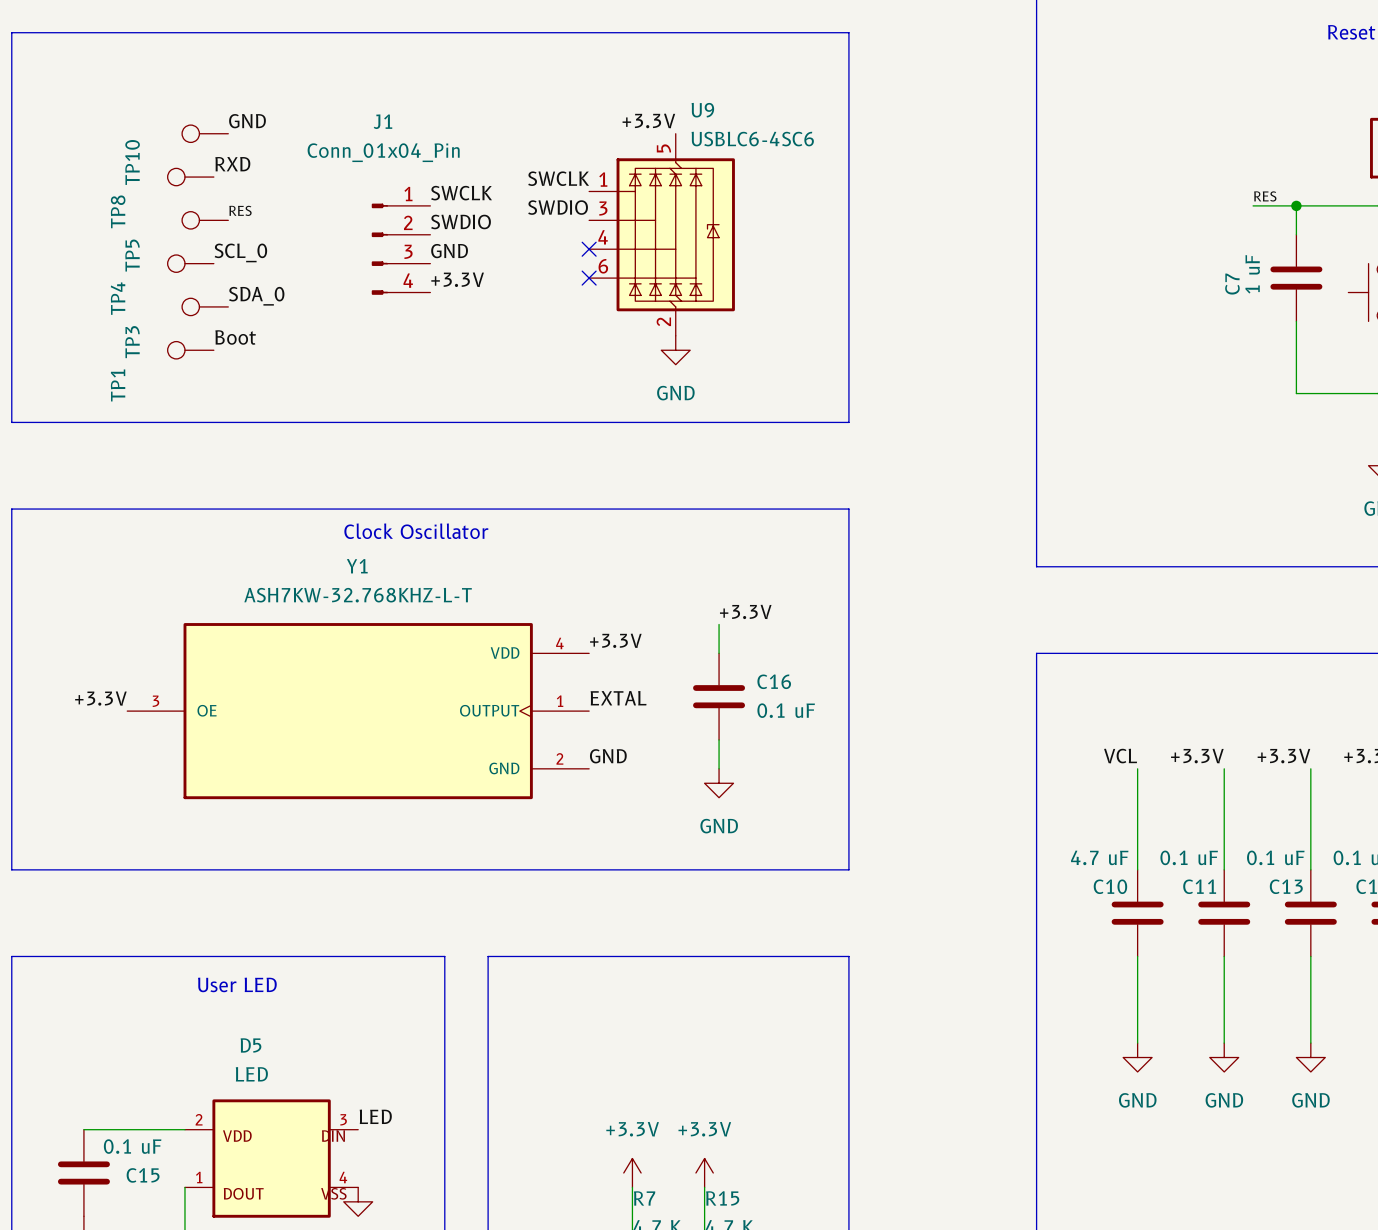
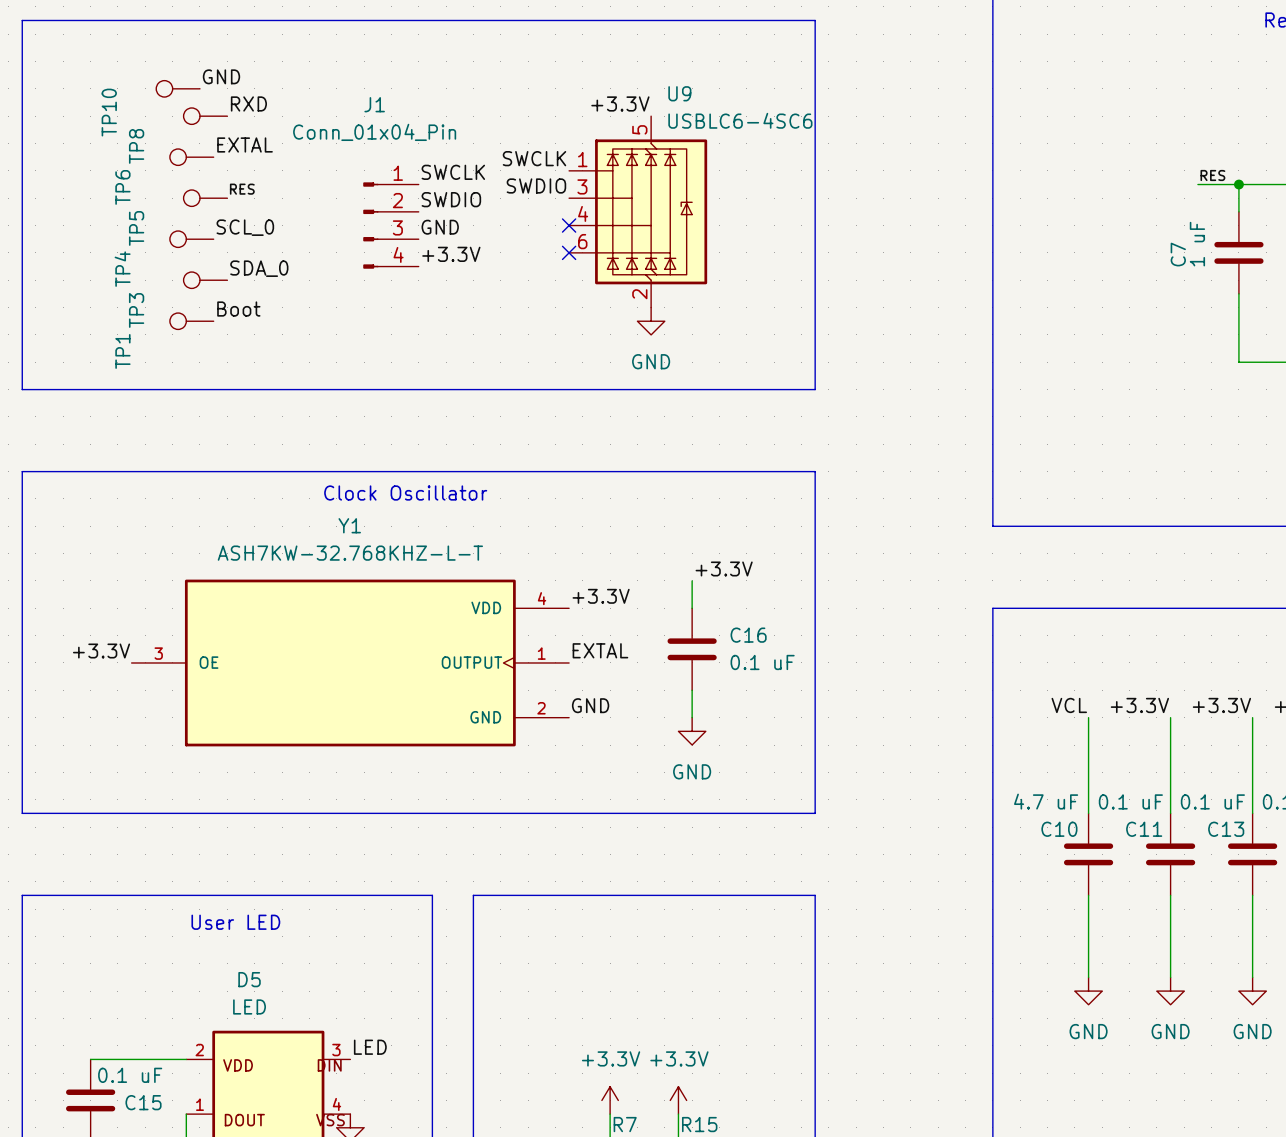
label: none -> GND (221, 76)
TP10: none -> (178, 88)
label: GND (247, 121) -> RXD (248, 103)
TP10 name: TP10 (132, 162) -> TP8 (136, 146)
label: RXD (232, 164) -> EXTAL (245, 144)
TP8 name: TP8 (118, 211) -> TP6 (122, 187)

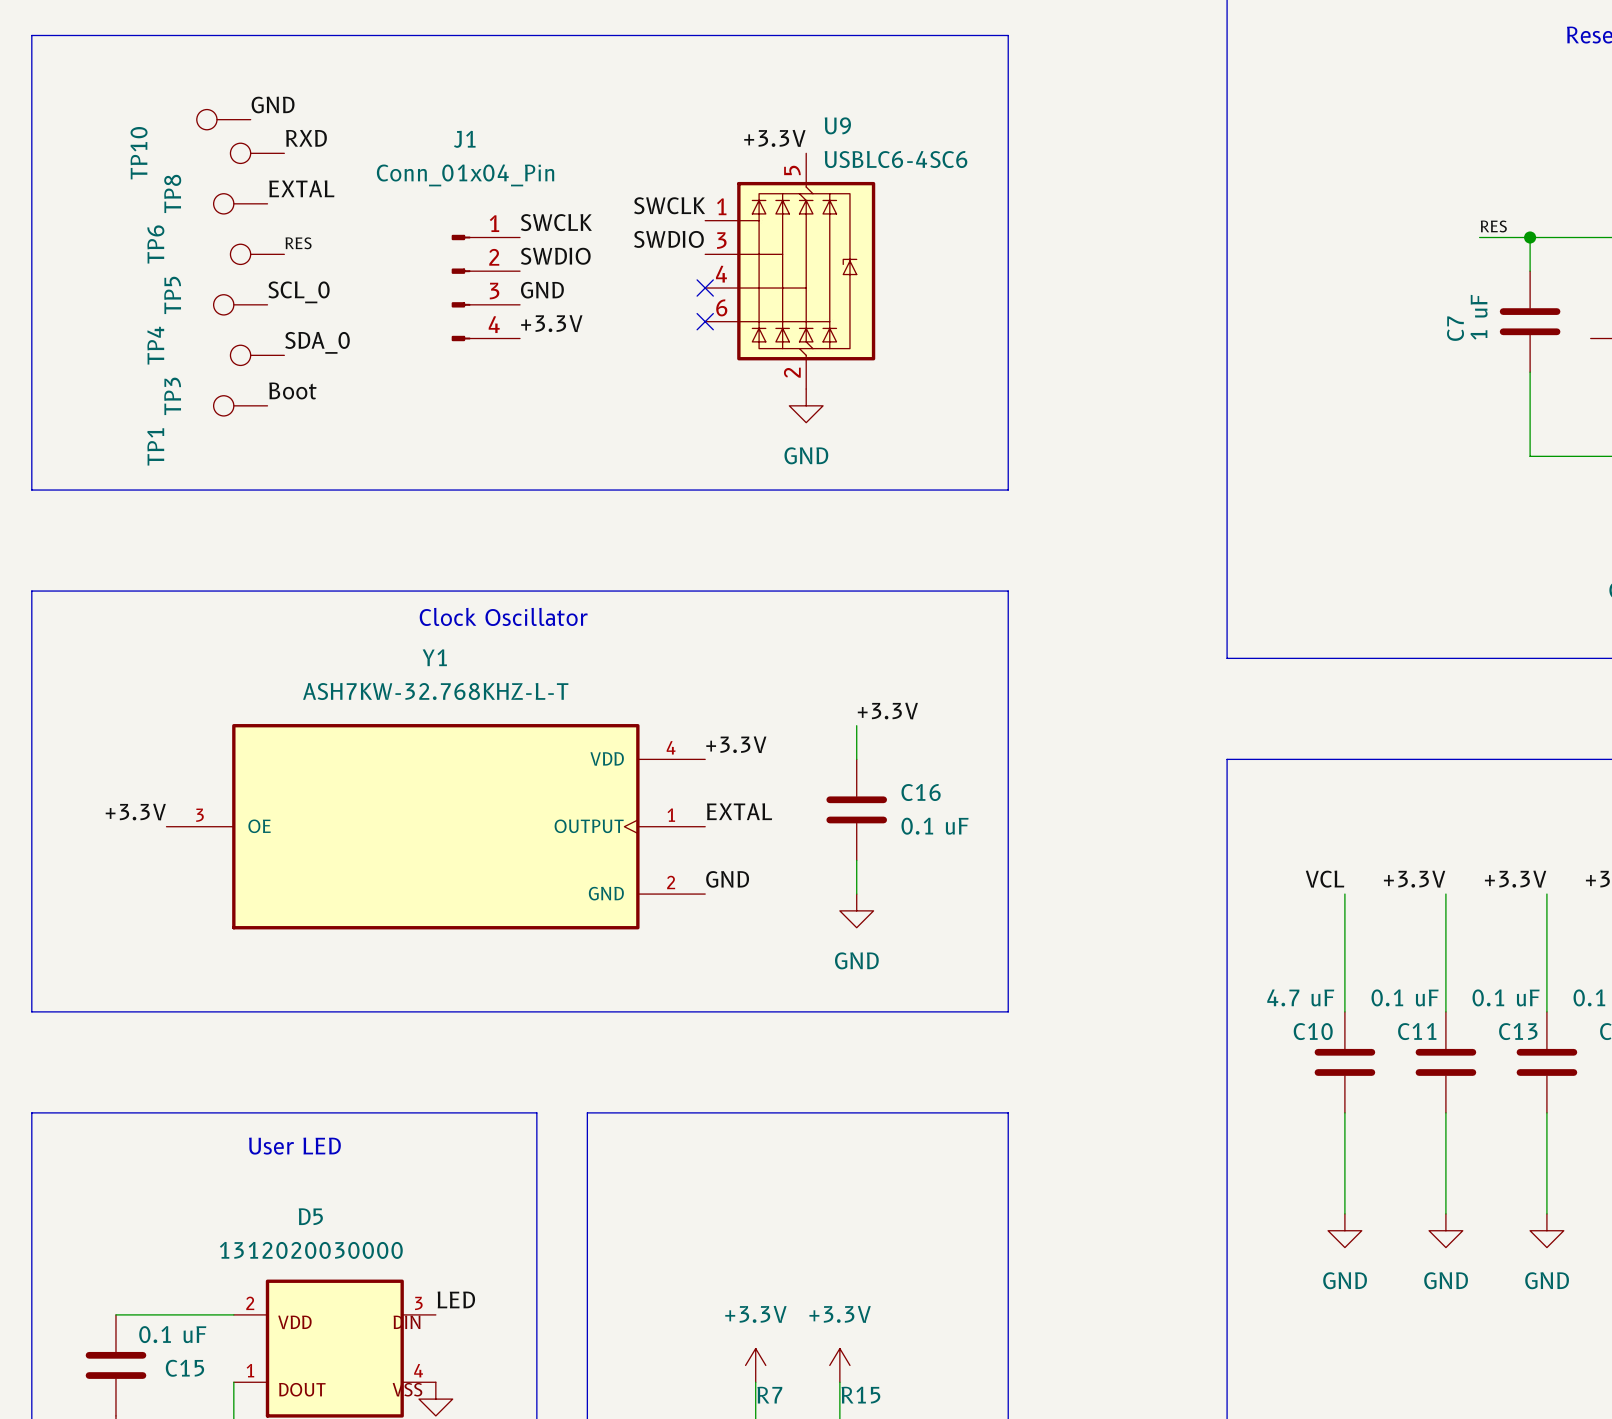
D5 value: LED (249, 1006) -> 1312020030000 (311, 1250)

